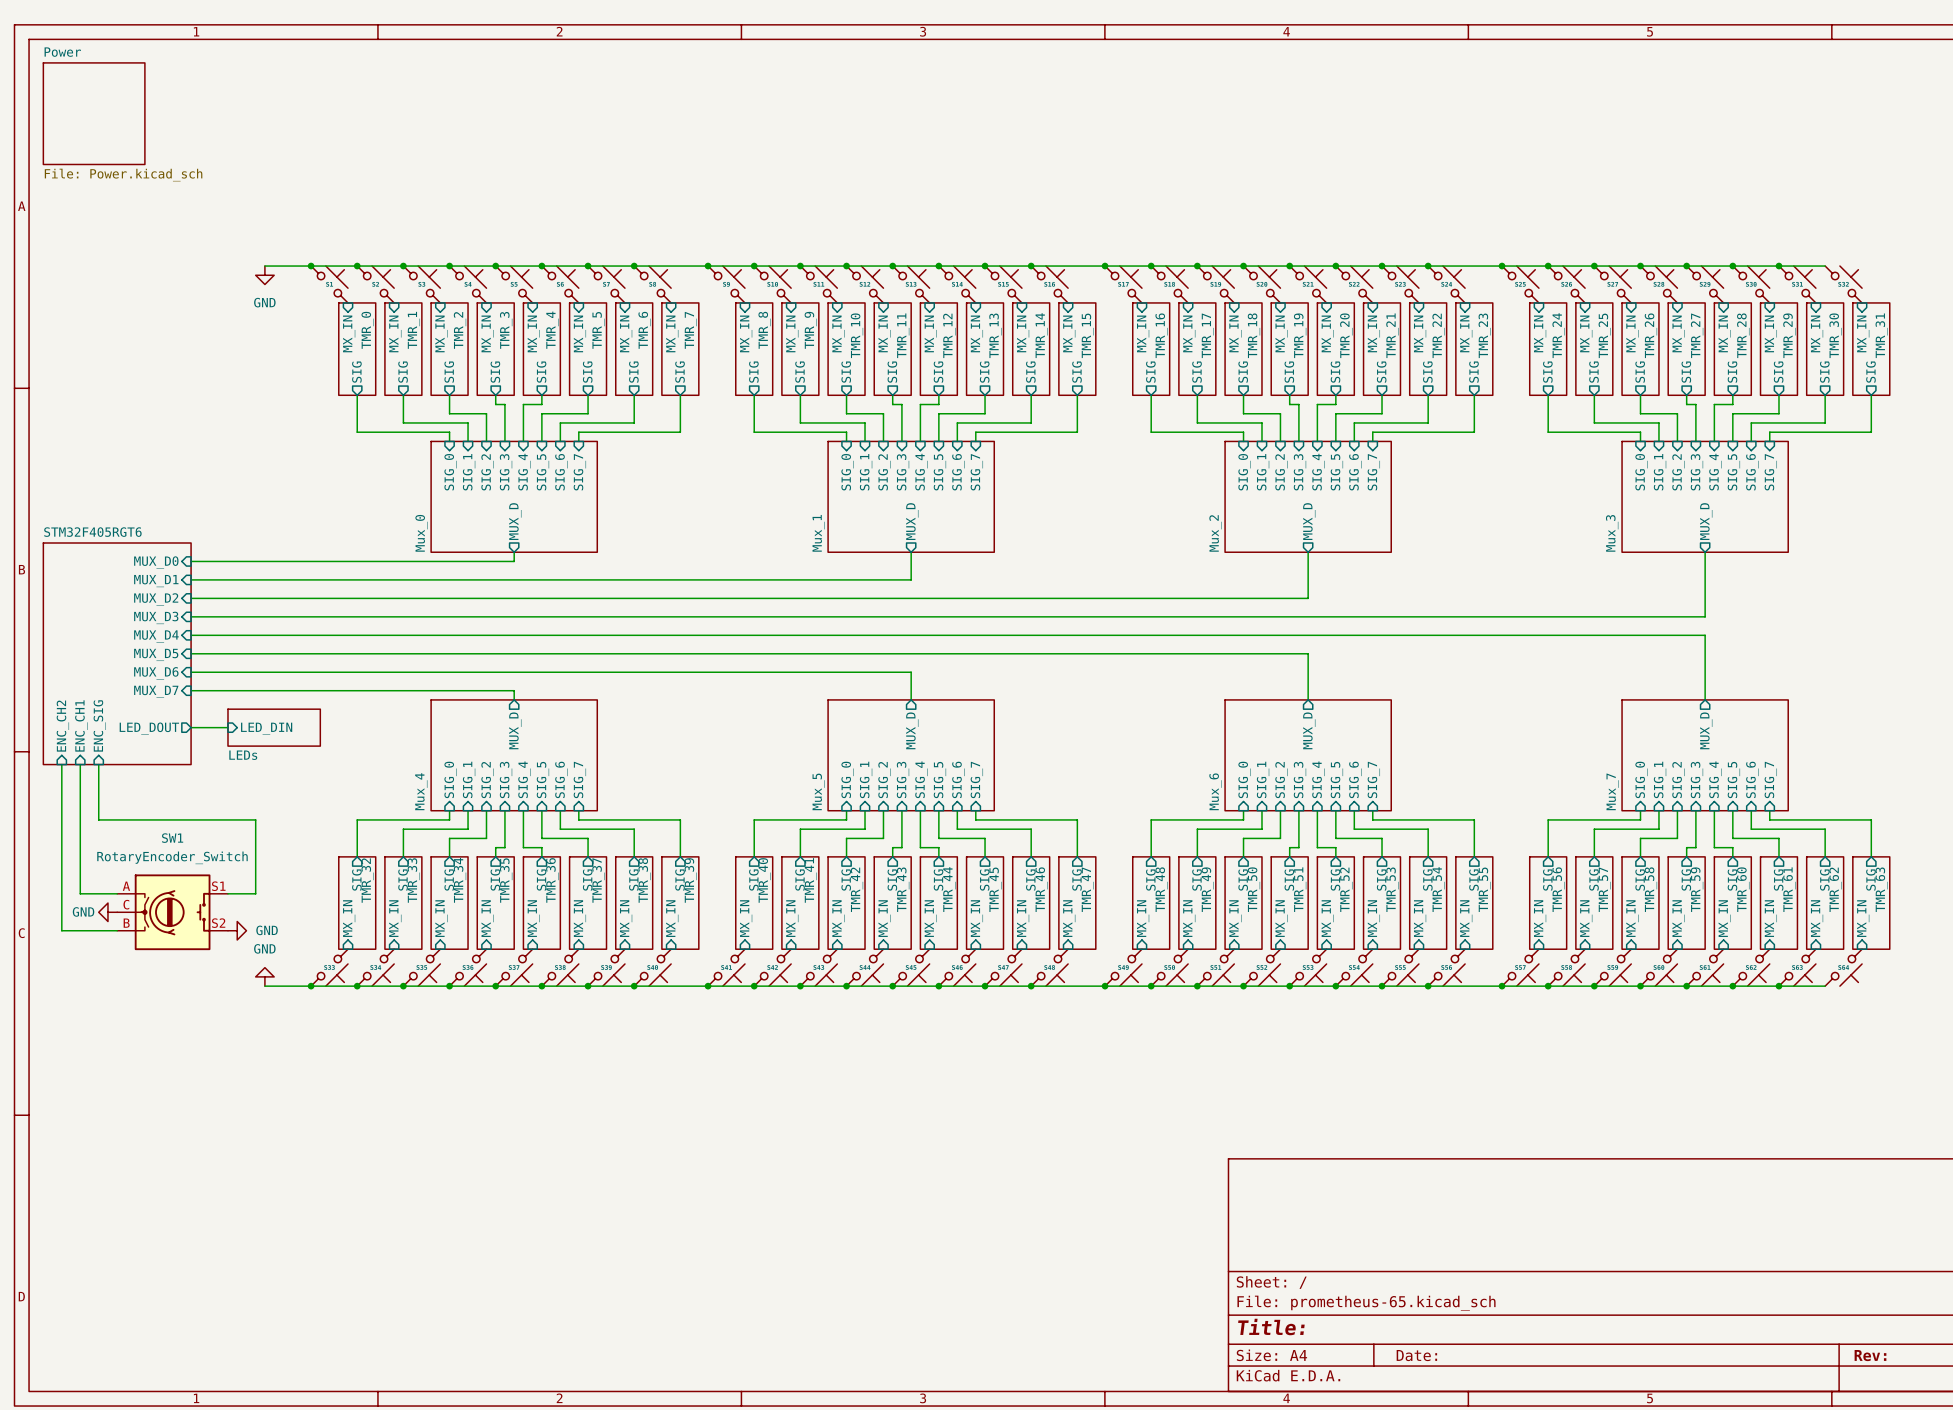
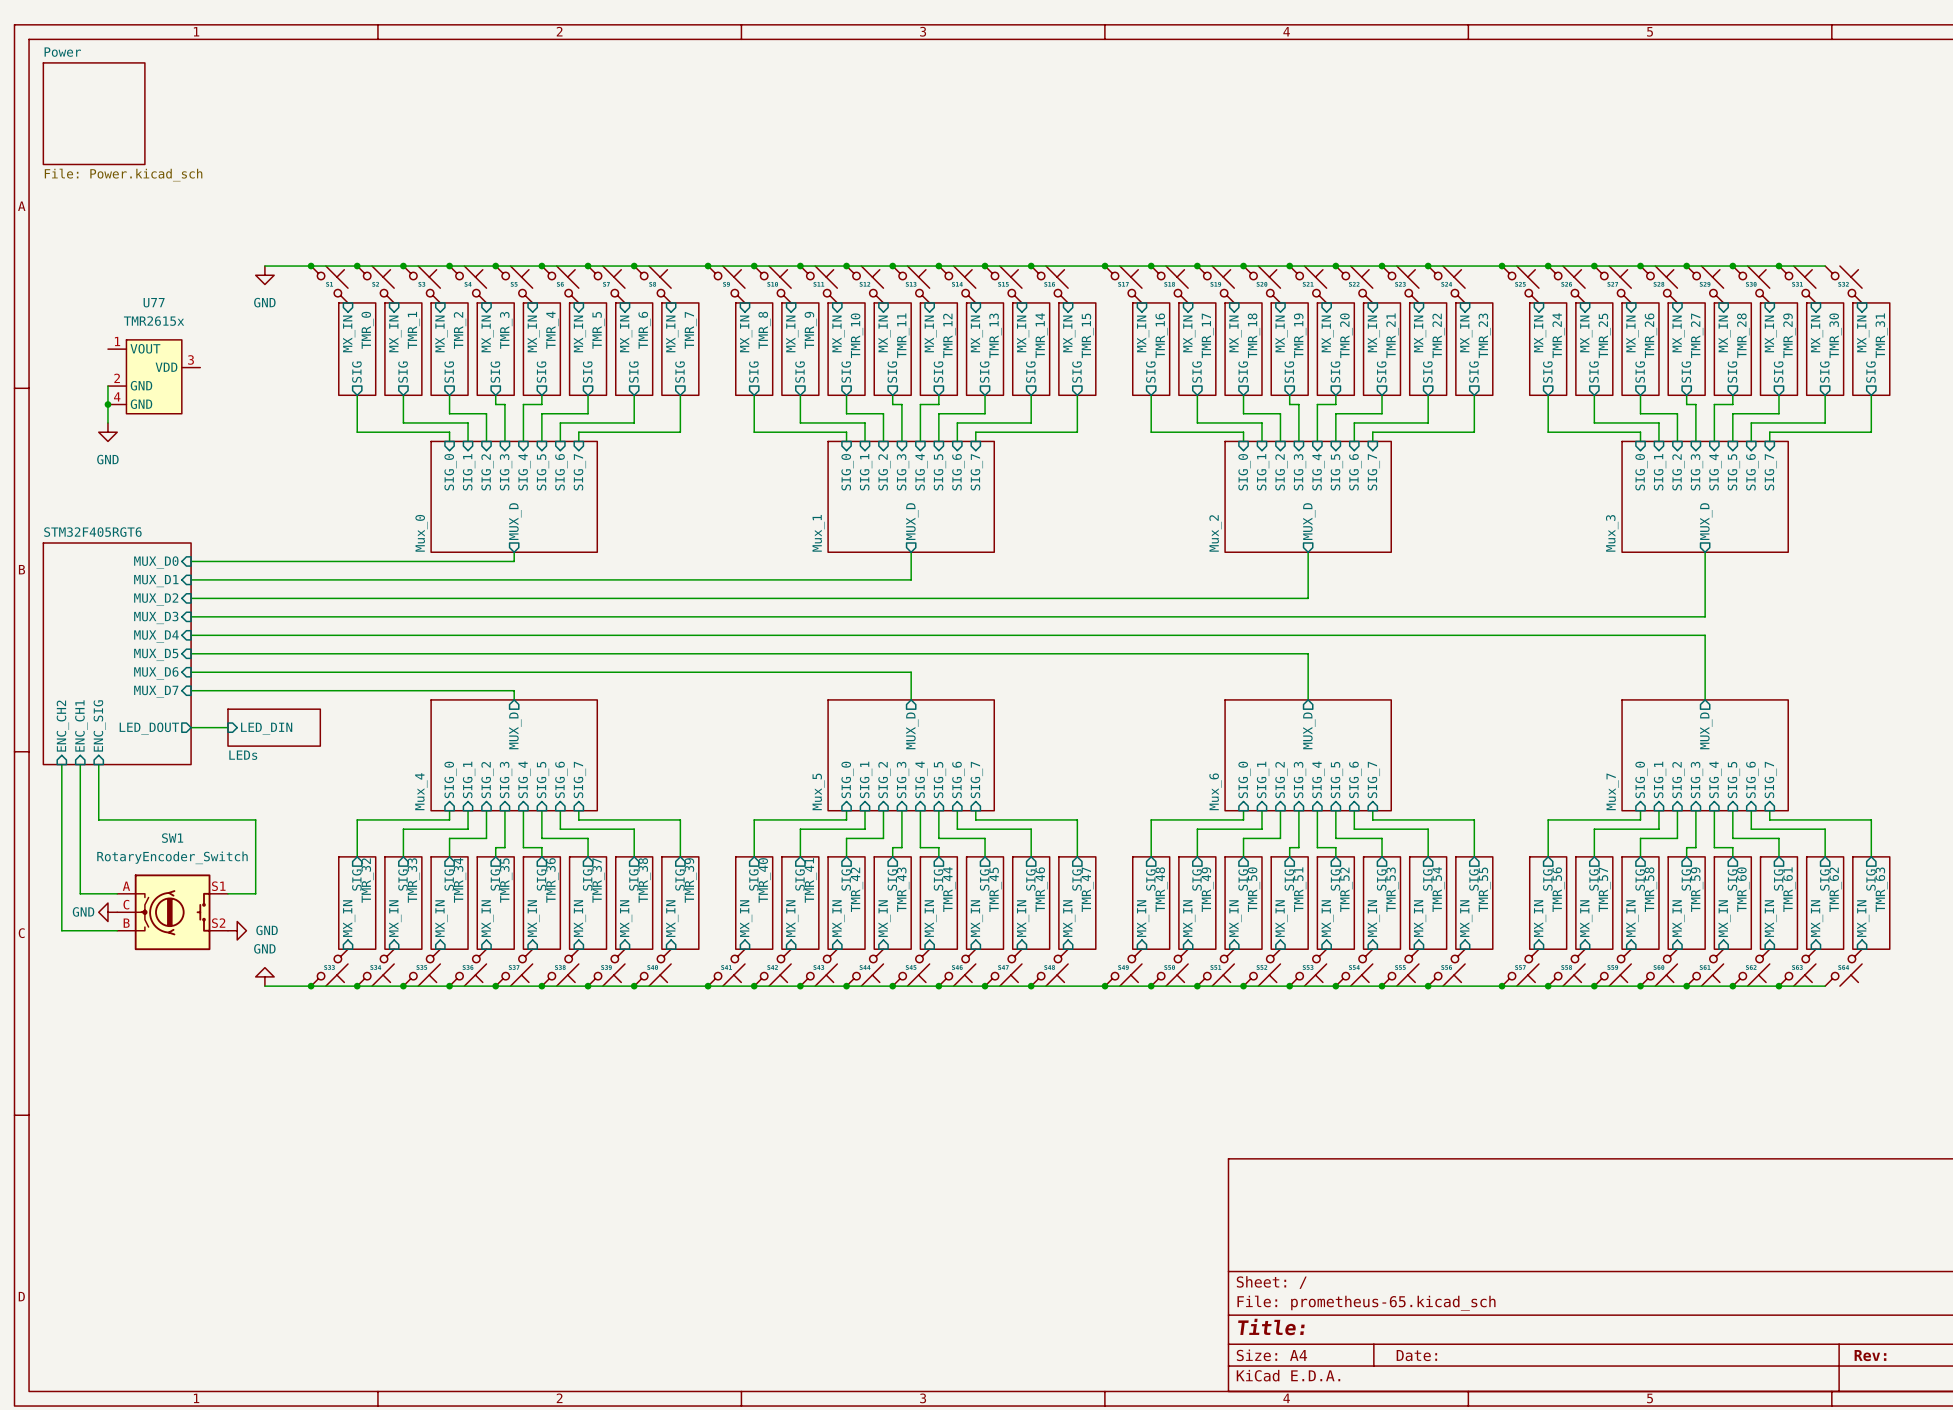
U77: none -> TMR2615x (154, 376)
wire: none -> (107, 386) (107, 422)
junction: none -> (107, 404)
power symbol: none -> GND (107, 432)

